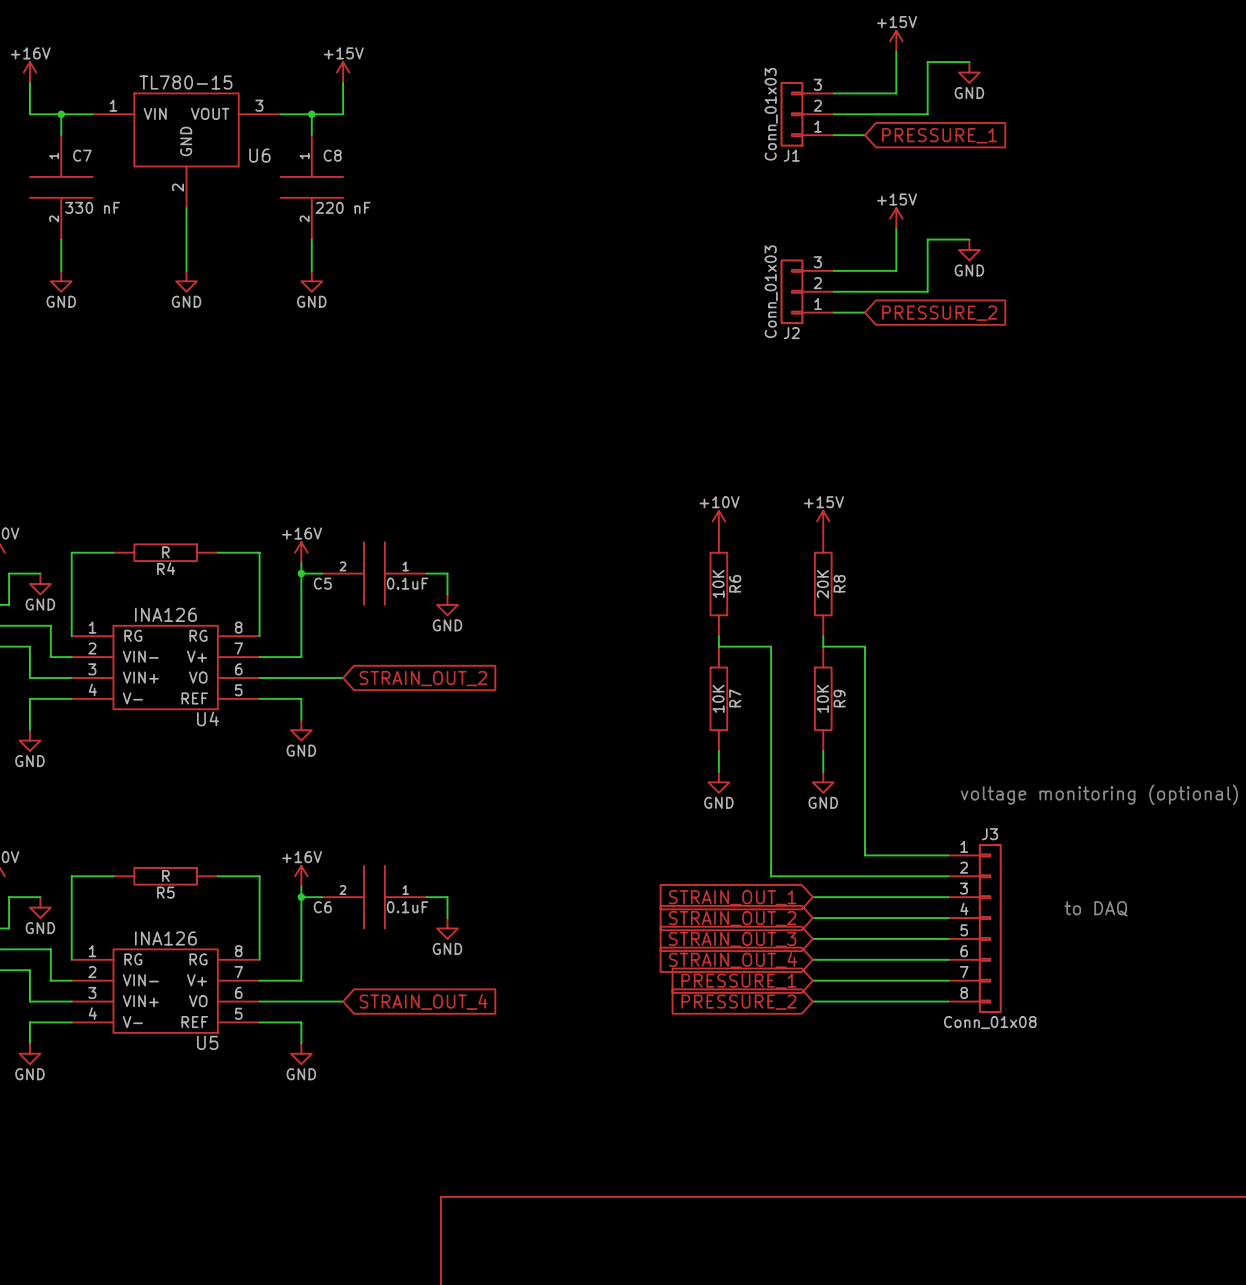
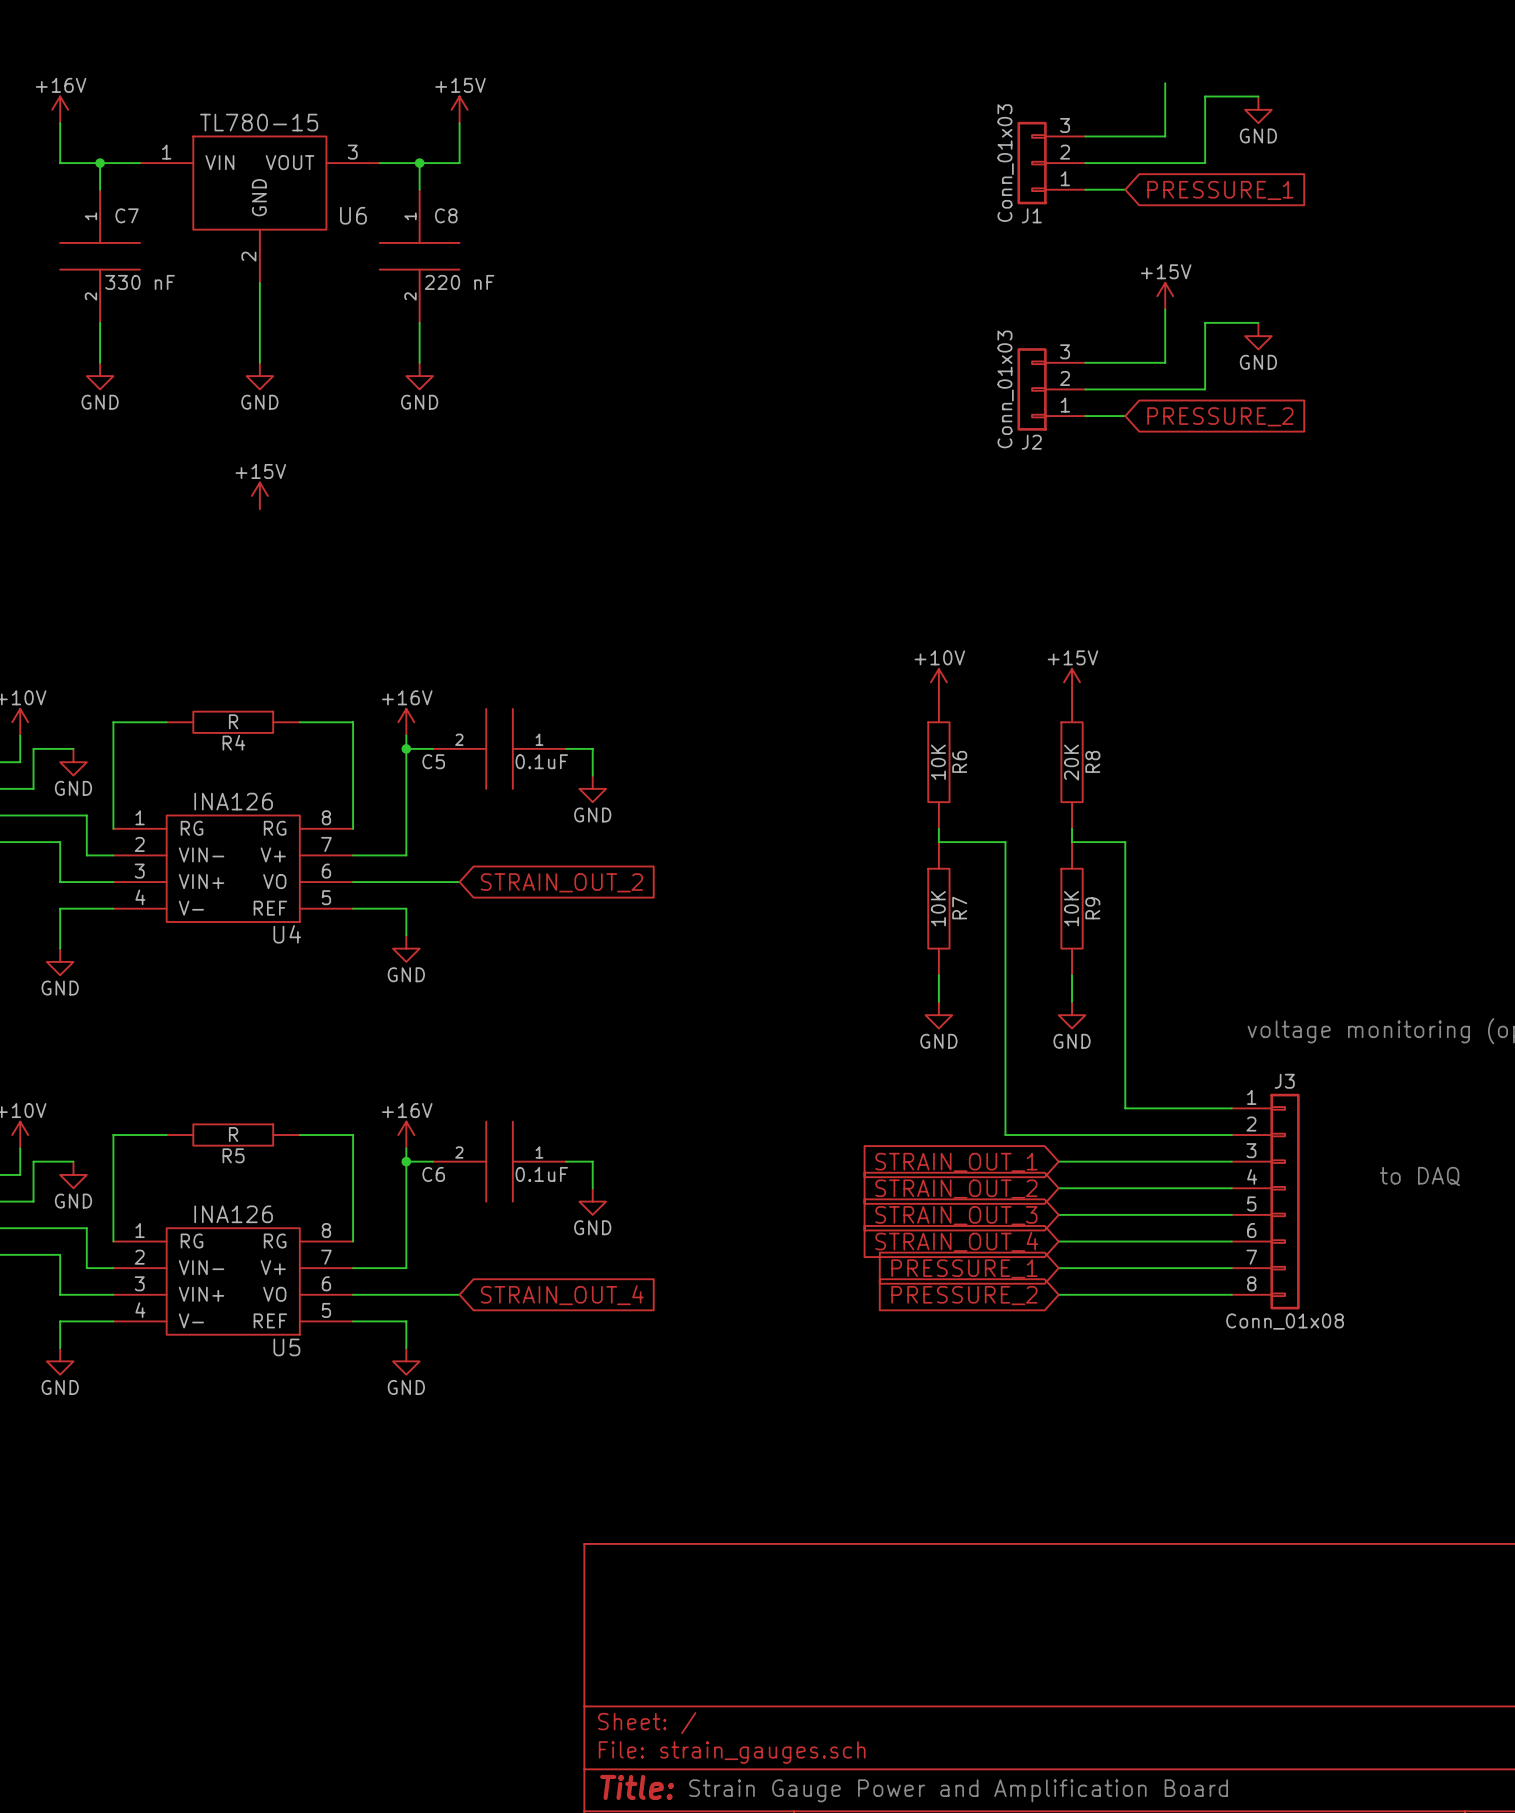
power symbol: +15V (896, 41) -> none
power symbol: none -> +15V (259, 495)

